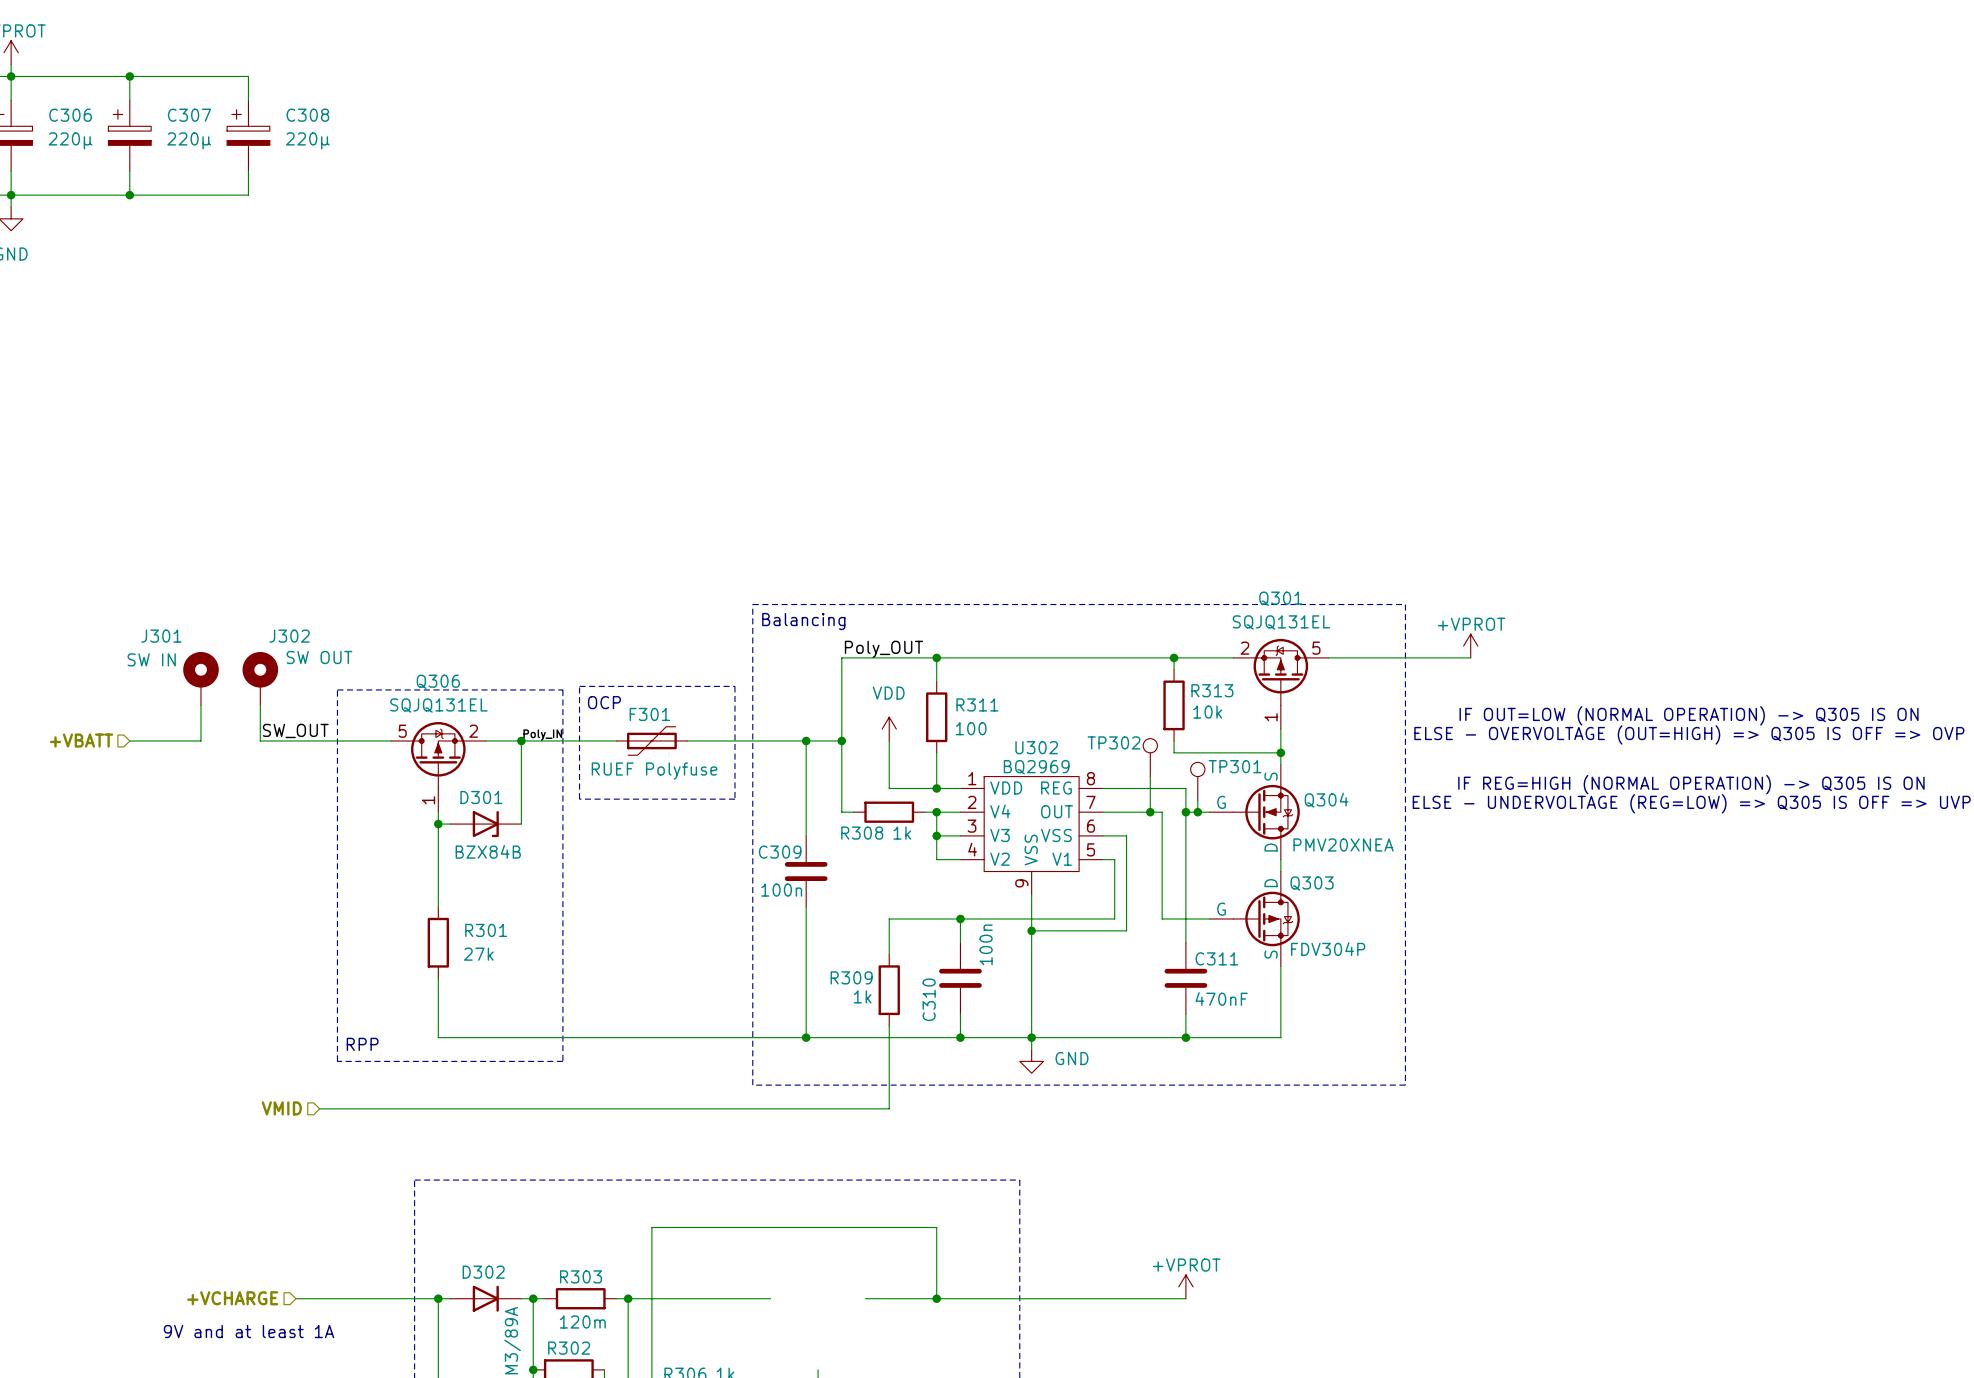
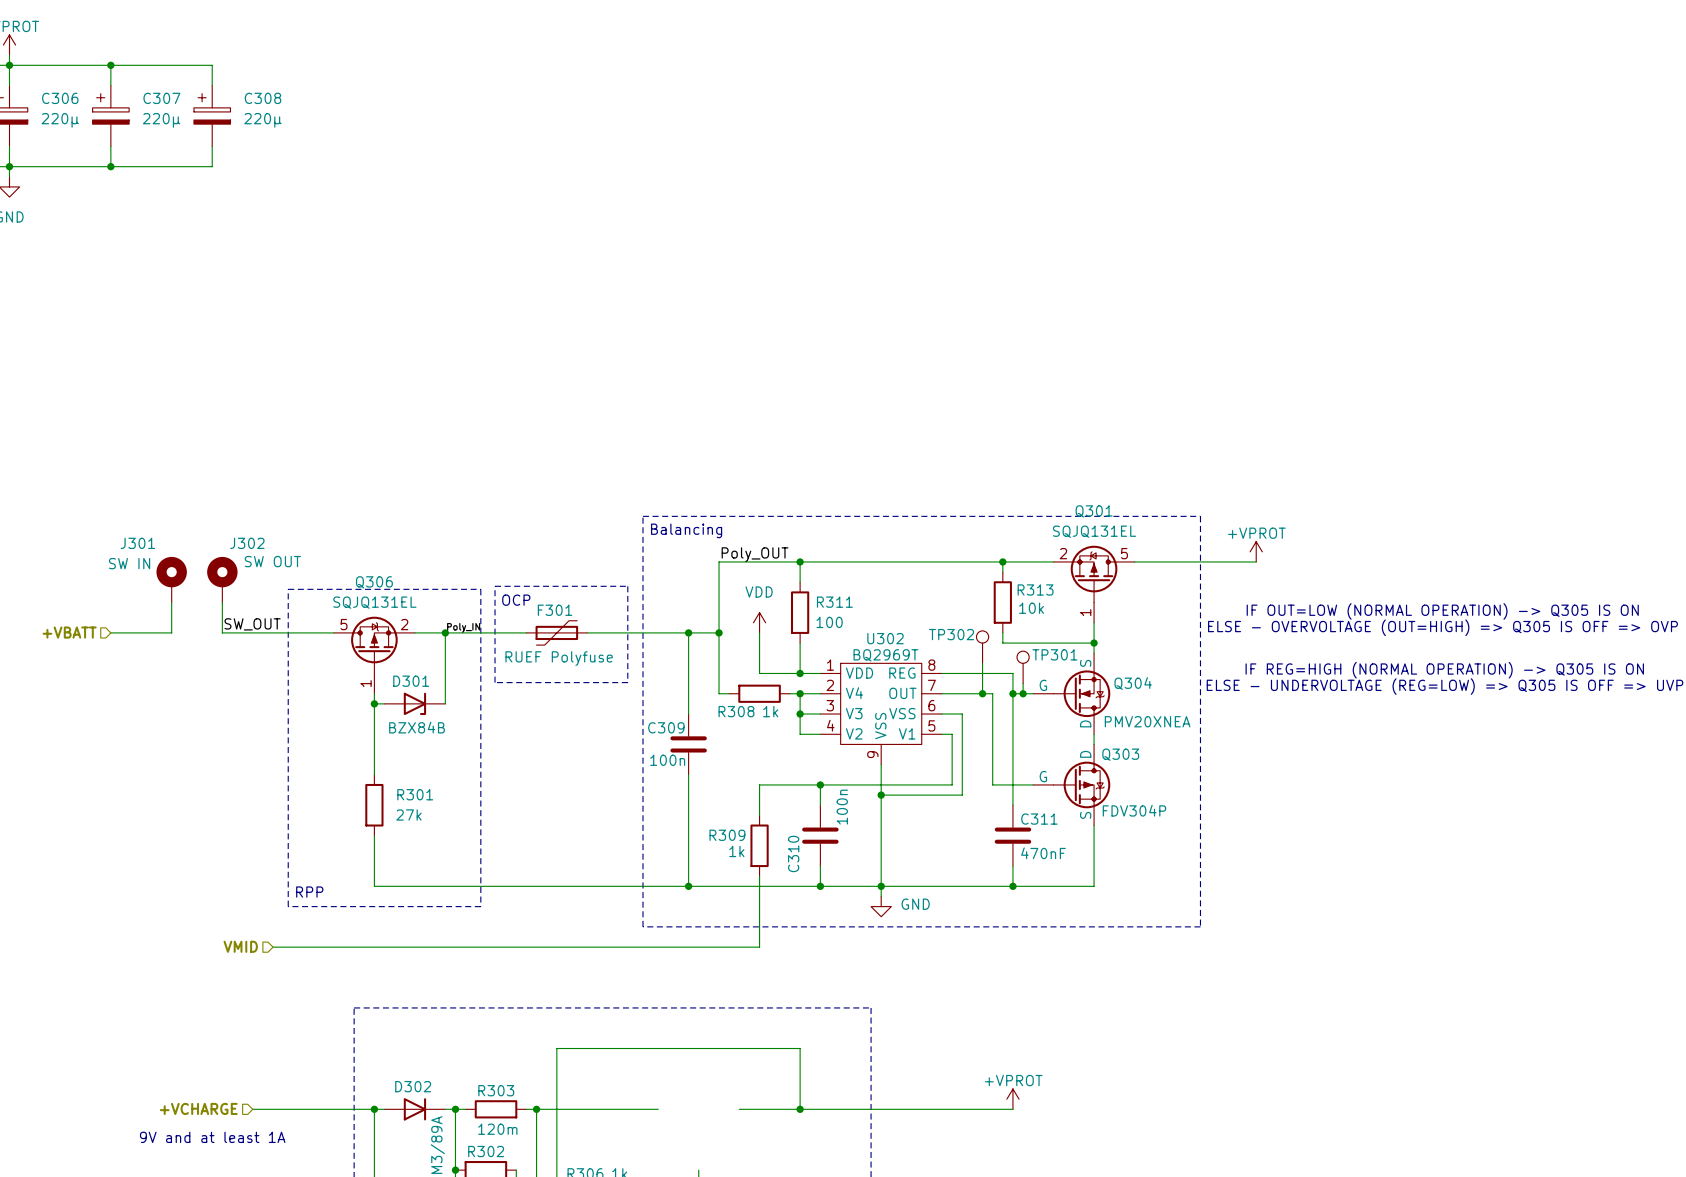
U302 value: BQ2969 (1036, 767) -> BQ2969T (885, 655)

